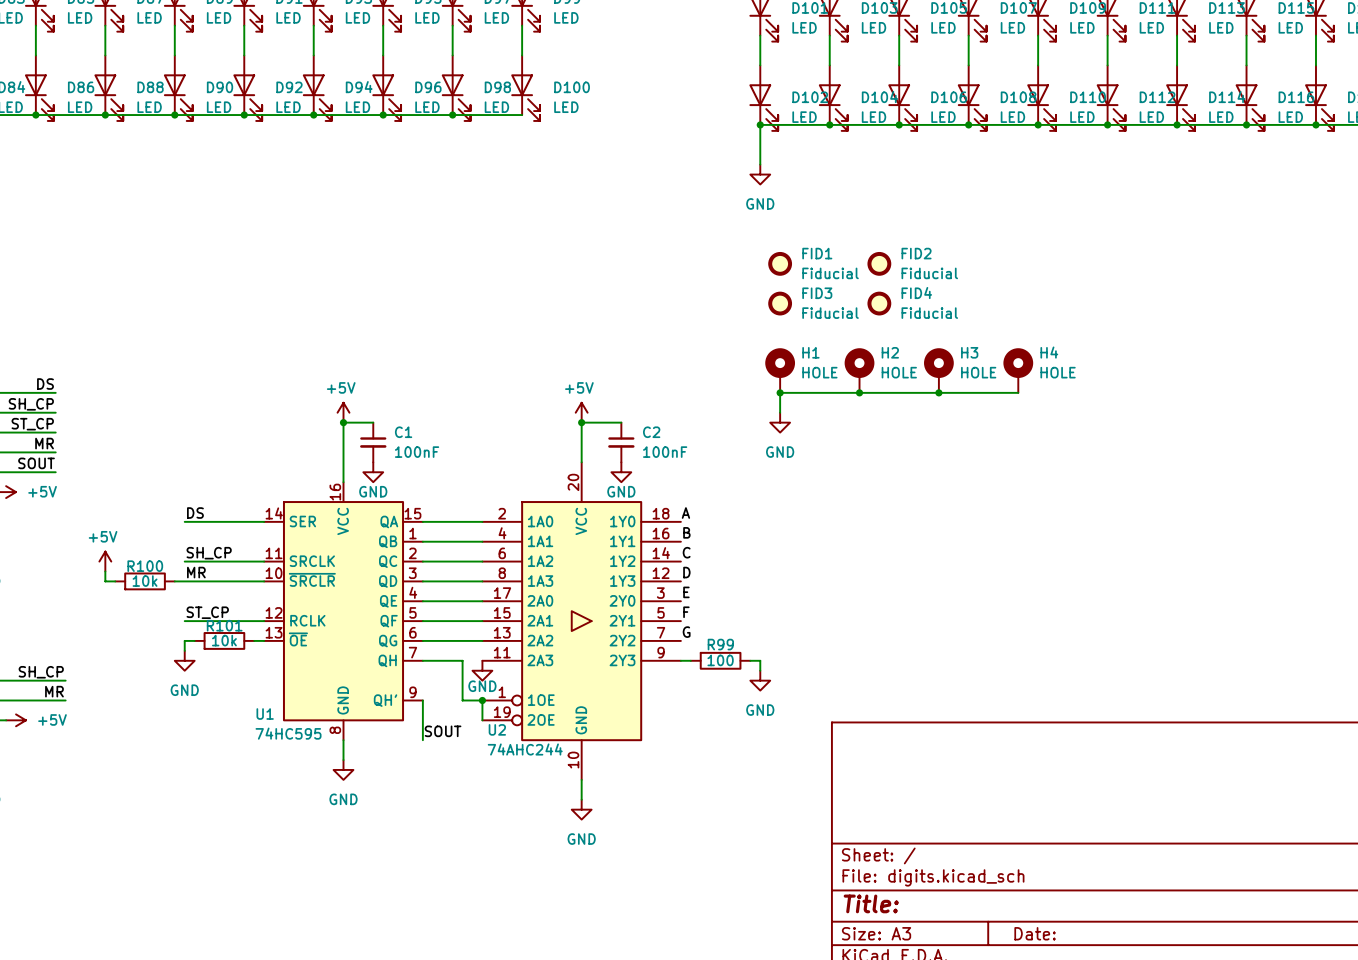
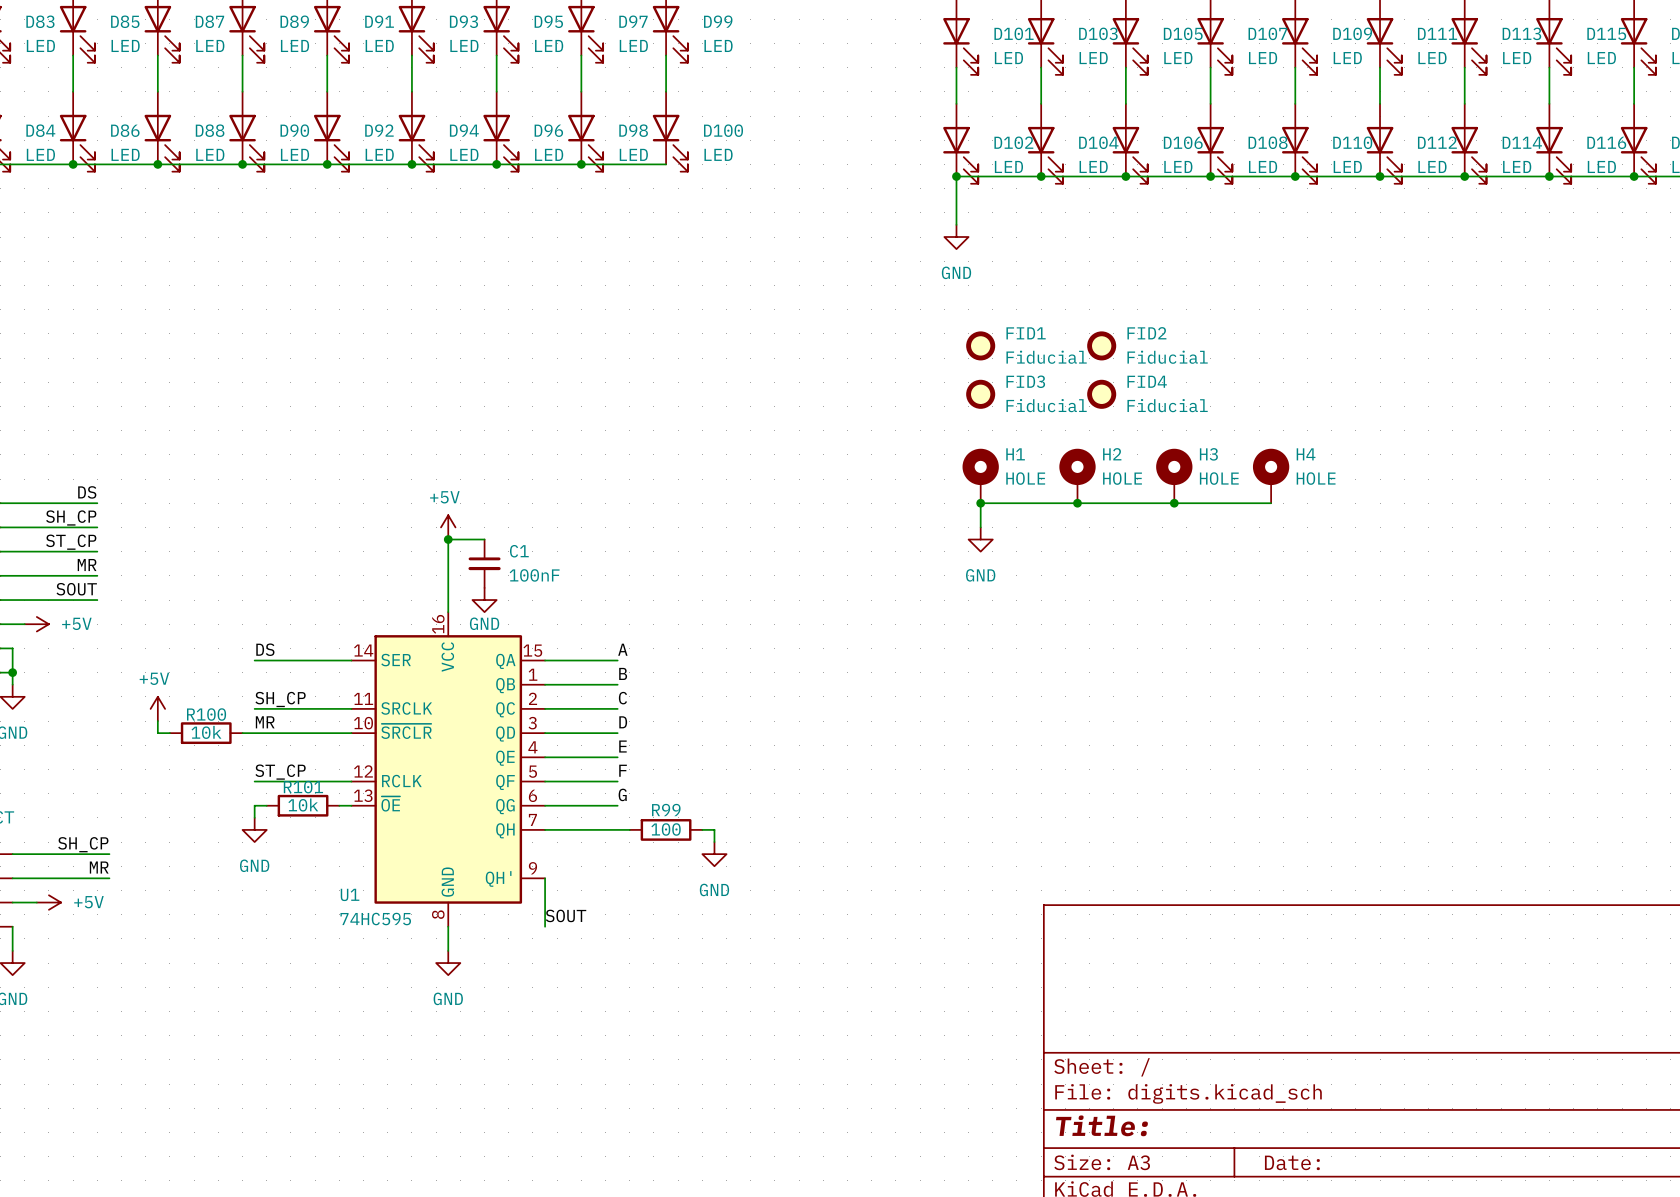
power symbol: +5V (581, 412) -> none
junction: (581, 422) -> none
wire: (621, 422) (581, 422) (581, 462) -> none
C2: 100nF (621, 442) -> none
power symbol: GND (621, 472) -> none
label: none -> A (622, 649)
label: A (685, 513) -> none
label: none -> B (623, 673)
label: B (686, 532) -> none
label: none -> C (622, 698)
label: C (686, 552) -> none
label: none -> D (623, 722)
label: D (686, 572) -> none
label: none -> E (622, 746)
label: E (686, 592) -> none
label: none -> F (623, 770)
label: F (686, 612) -> none
U2: 74AHC244 (581, 621) -> none
label: none -> G (622, 794)
label: G (686, 632) -> none
wire: (462, 660) (462, 700) (482, 700) (482, 720) -> (593, 829) (629, 829)
wire: (680, 660) (690, 660) -> none
R99 position: (720, 660) -> (666, 829)
wire: (750, 660) (760, 660) (760, 670) -> none
power symbol: GND (482, 670) -> none
power symbol: none -> GND (714, 854)
power symbol: GND (760, 680) -> none
junction: (482, 700) -> none
wire: (581, 779) (581, 799) -> none
power symbol: GND (581, 809) -> none

